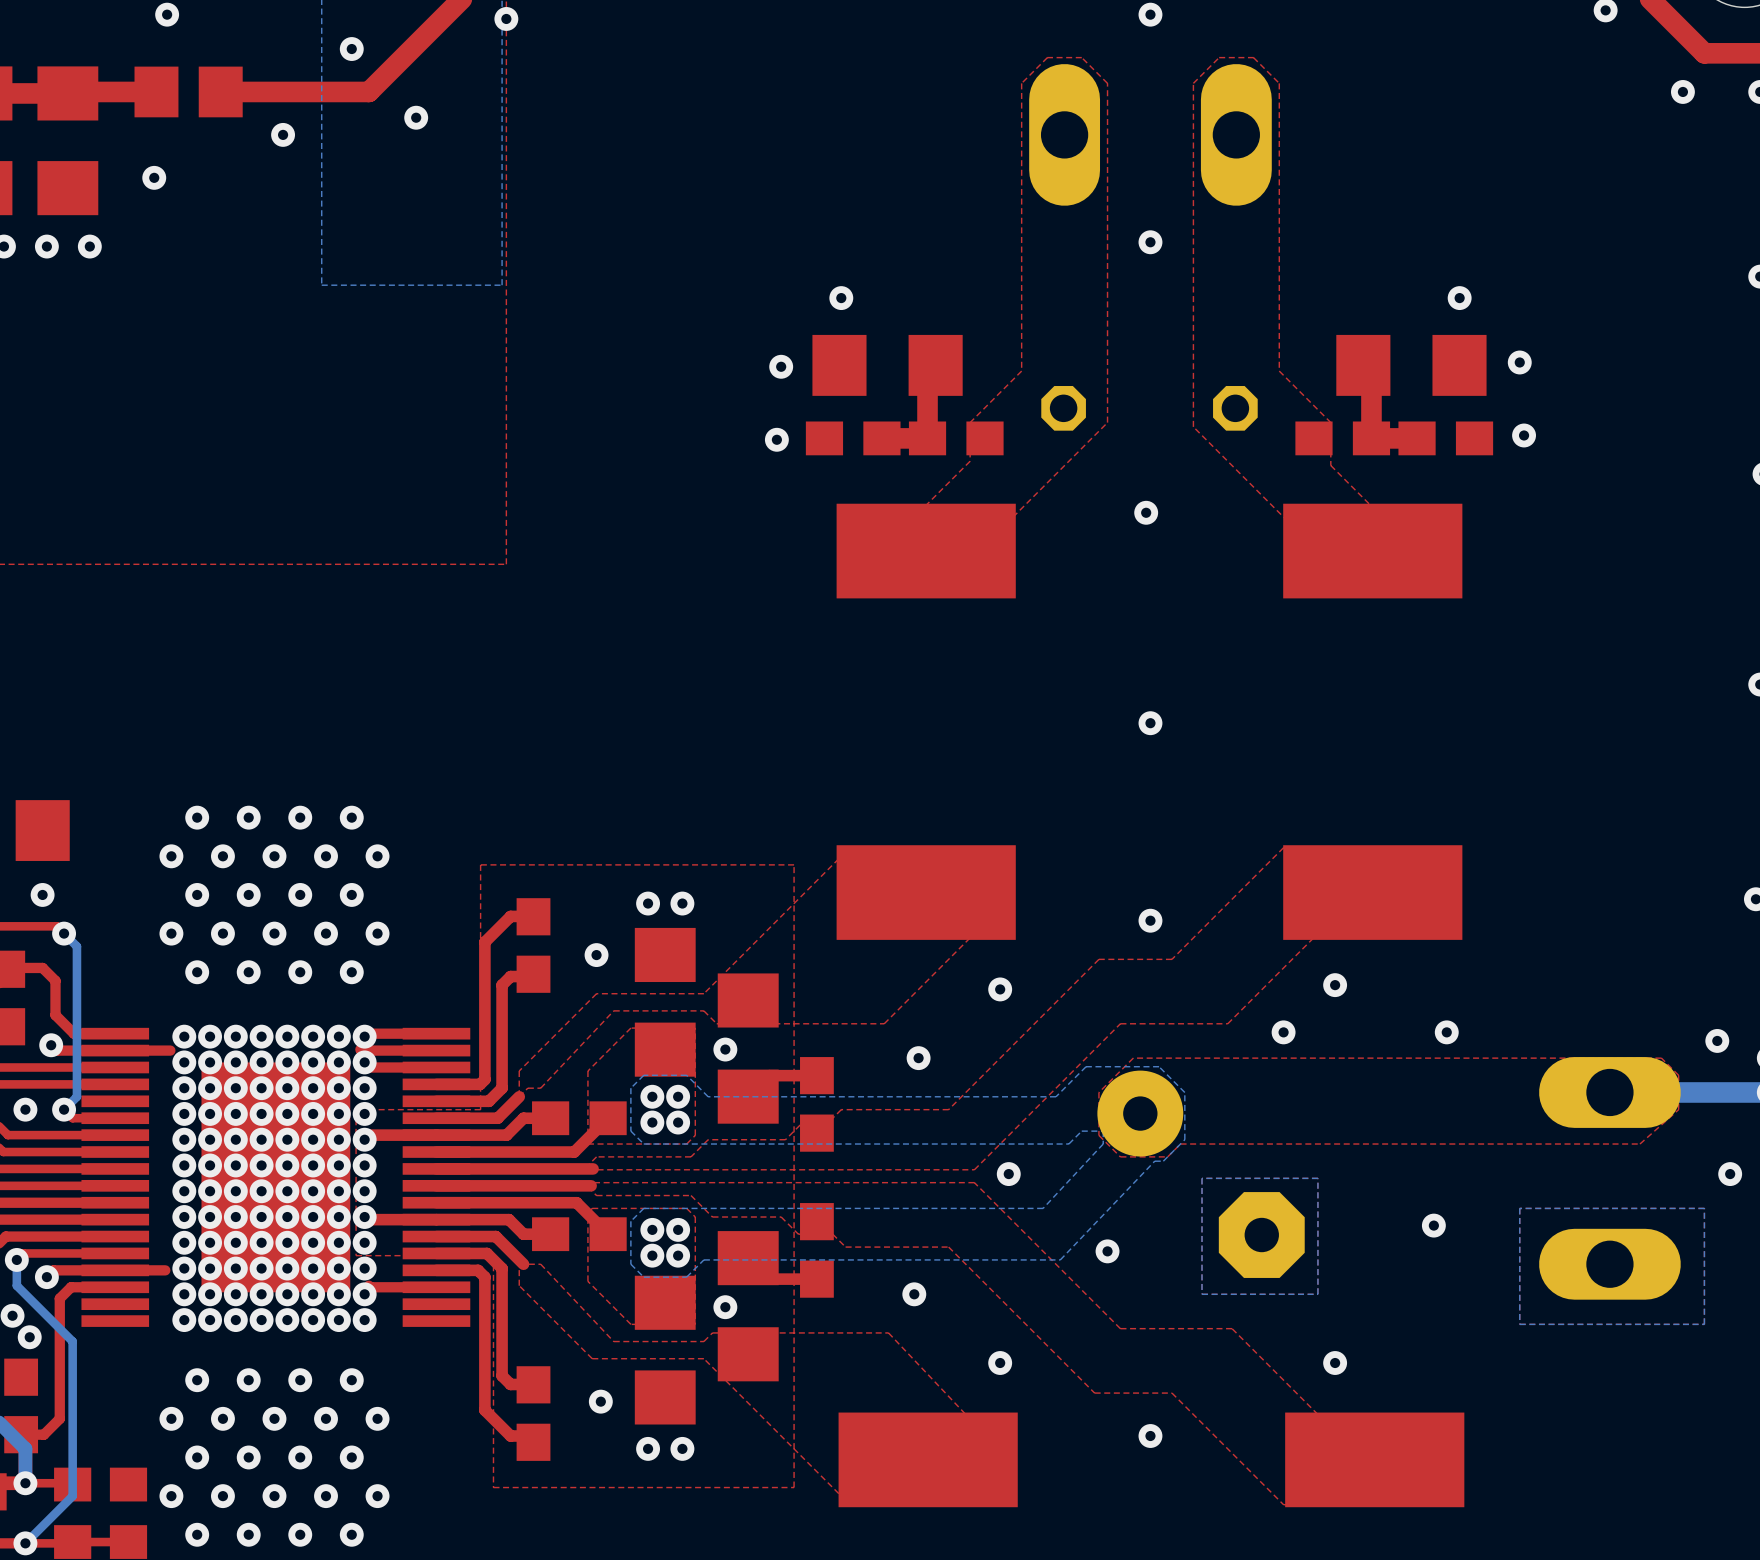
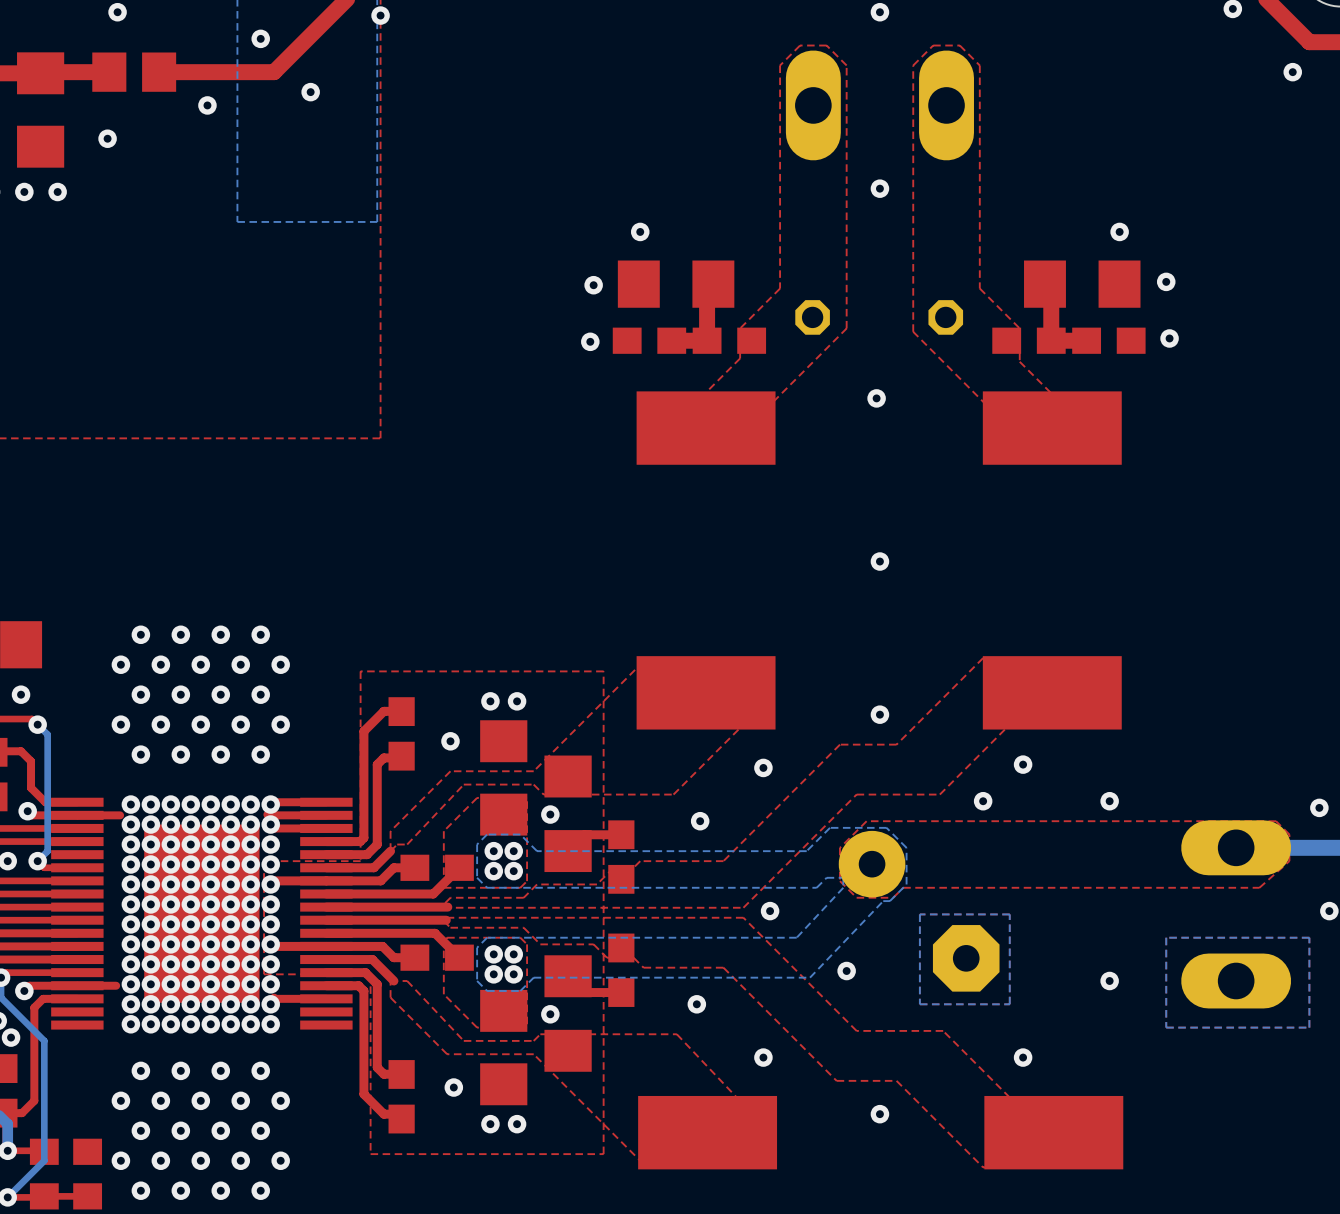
via position: (1433, 1225) -> (1109, 981)

